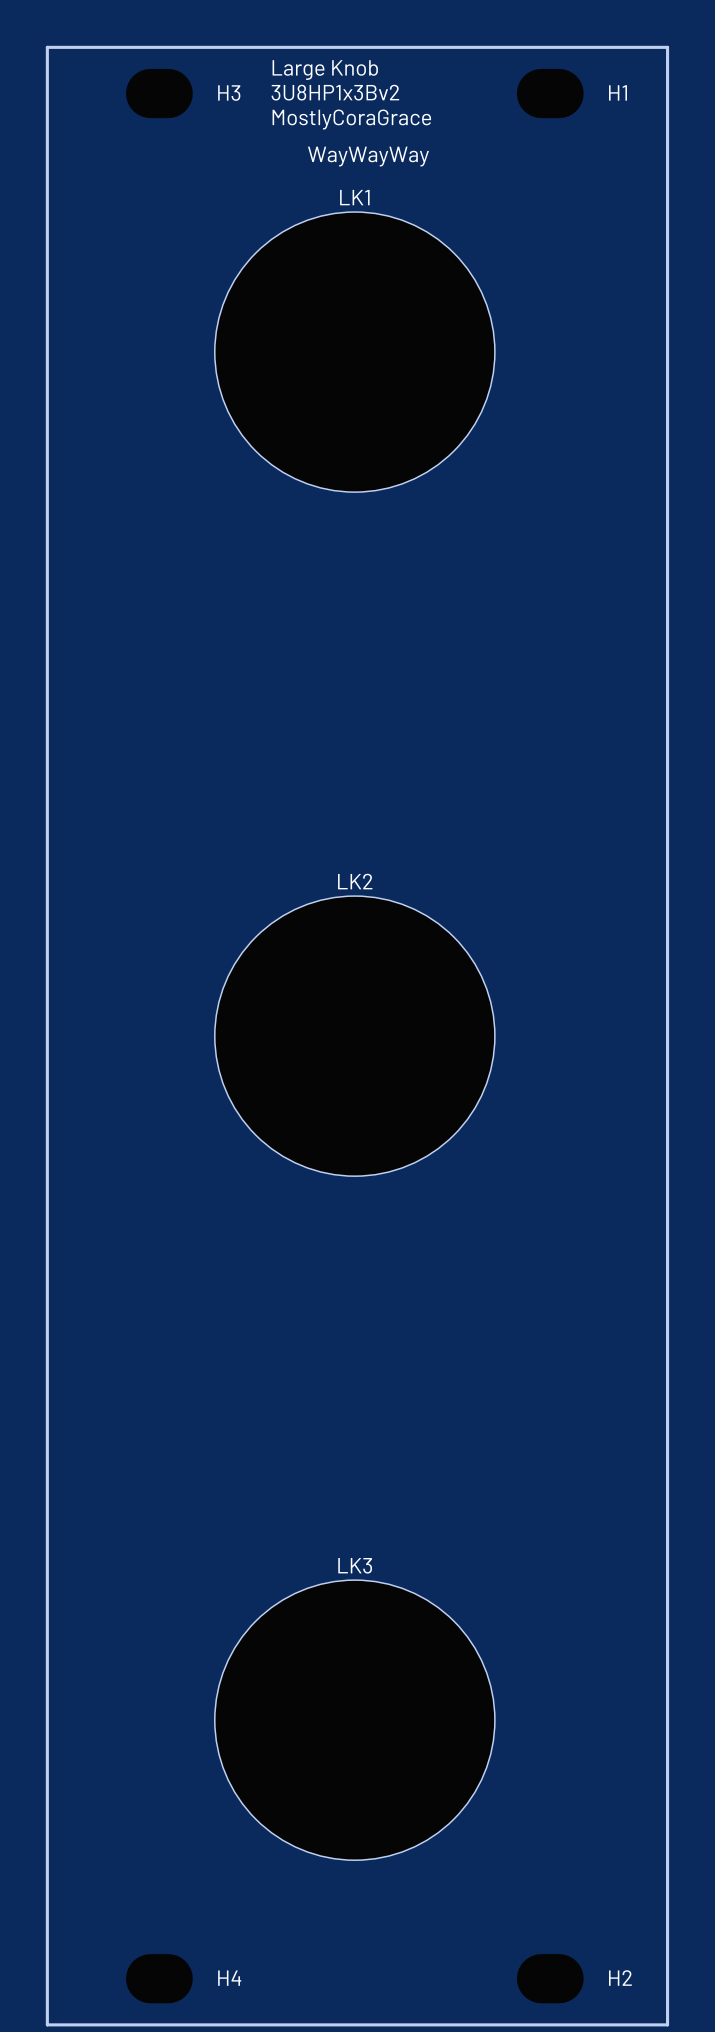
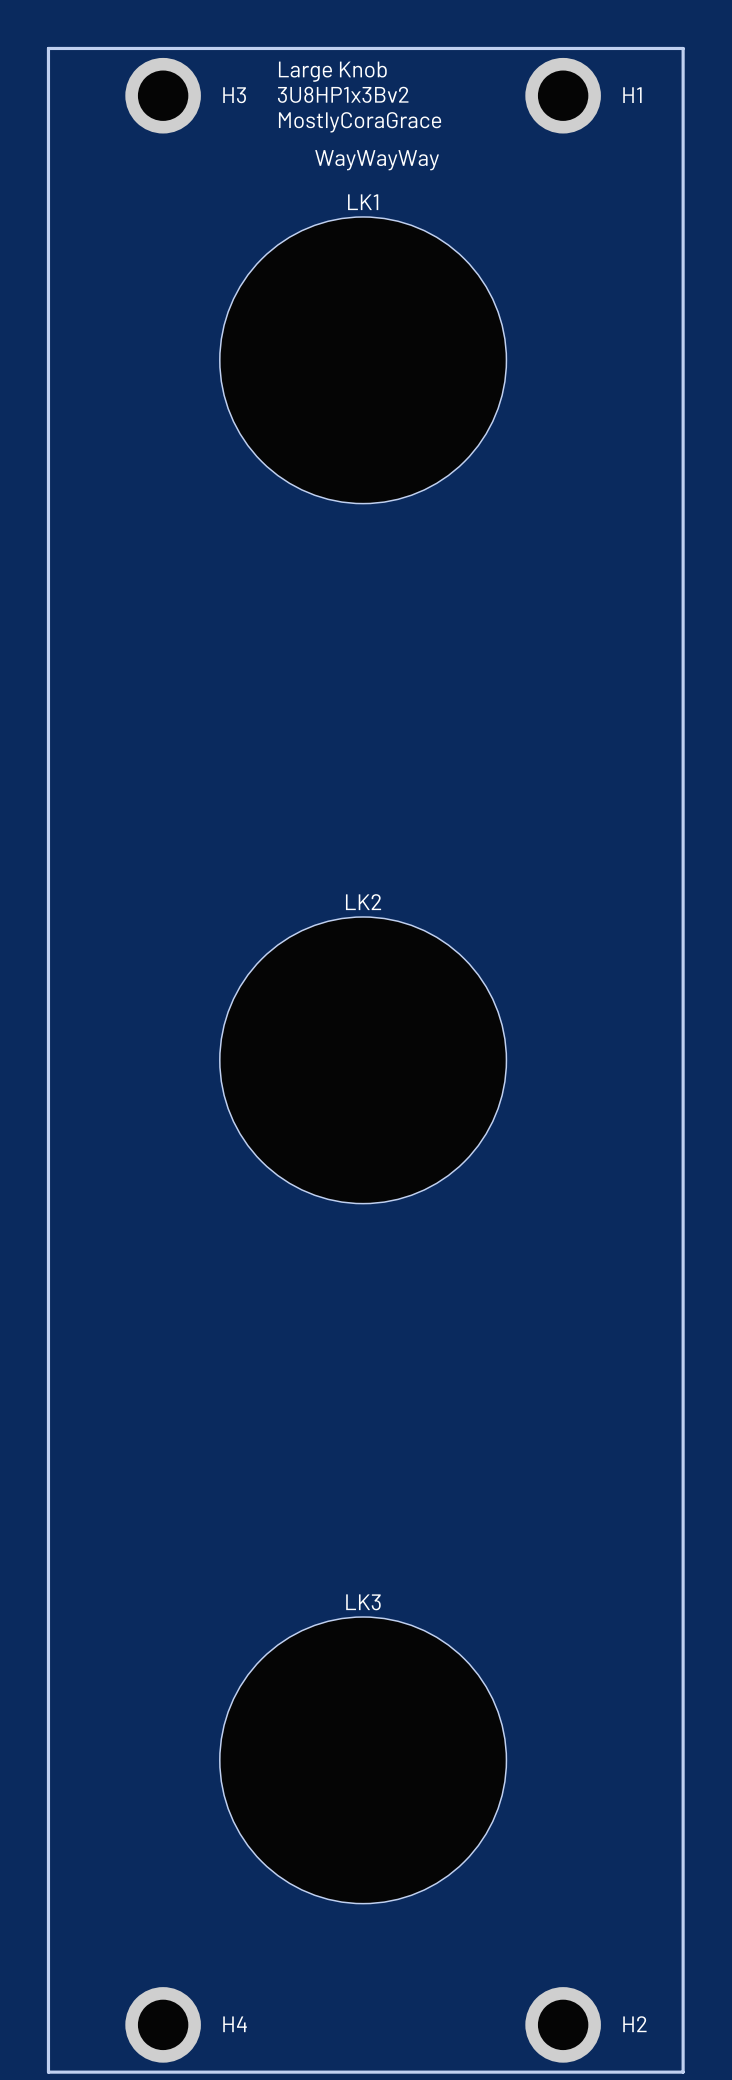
H3 footprint: [126, 68, 193, 119] -> [125, 57, 201, 134]
H1 footprint: [516, 68, 584, 119] -> [525, 57, 601, 134]
H4 footprint: [126, 1954, 193, 2004] -> [125, 1987, 201, 2063]
H2 footprint: [516, 1954, 584, 2004] -> [525, 1987, 601, 2063]

